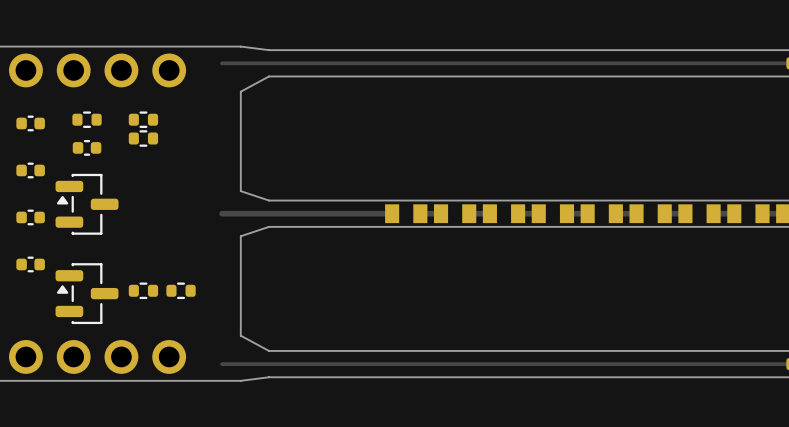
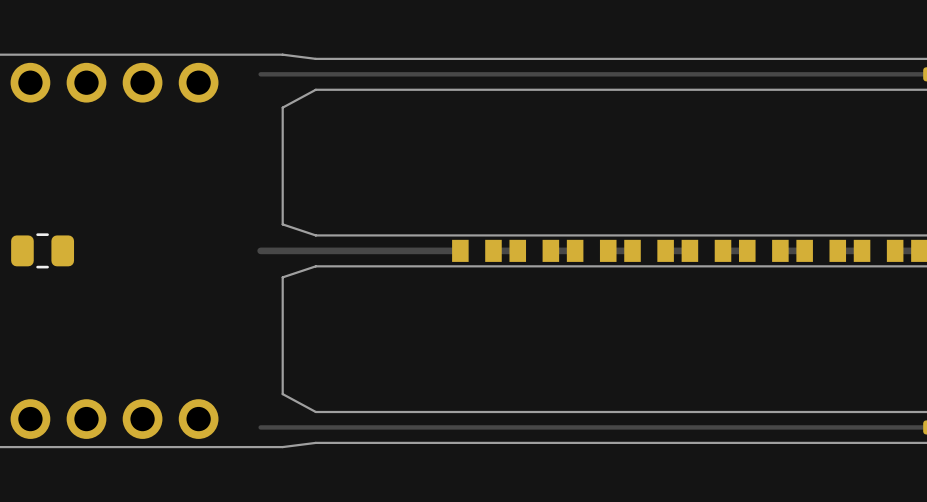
part: (87, 119) -> none
part: (143, 119) -> none
part: (30, 123) -> none
part: (143, 138) -> none
part: (87, 147) -> none
part: (30, 170) -> none
part: (87, 204) -> none
part footprint: [16, 209, 45, 226] -> [11, 233, 75, 269]
part: (30, 264) -> none
part: (143, 290) -> none
part: (181, 290) -> none
part: (87, 293) -> none

